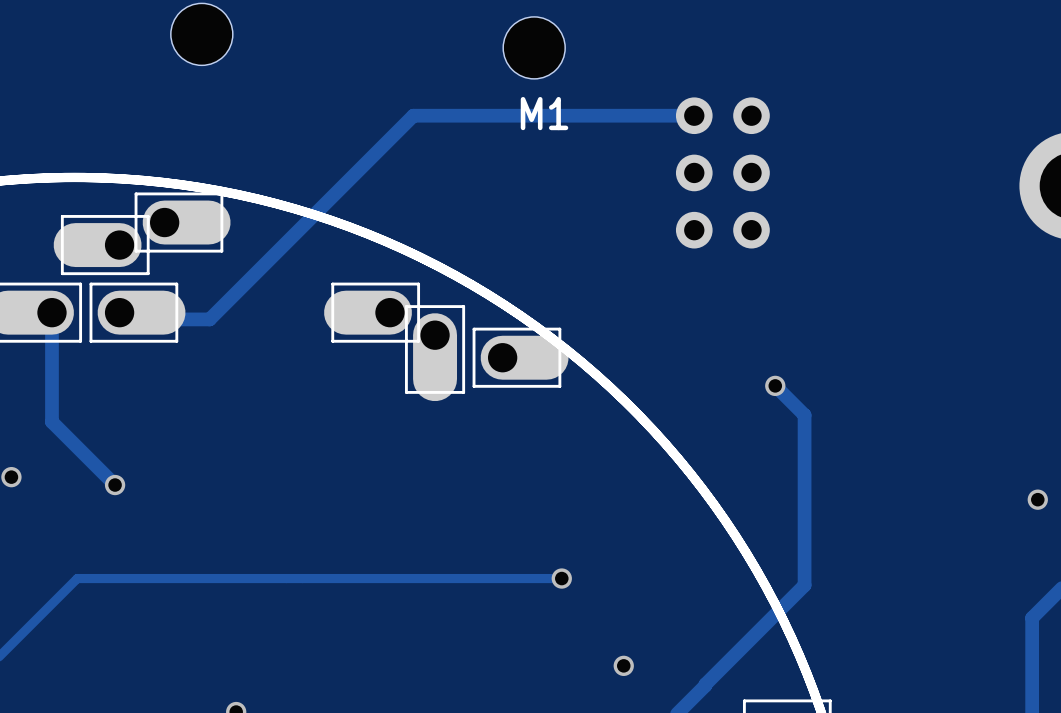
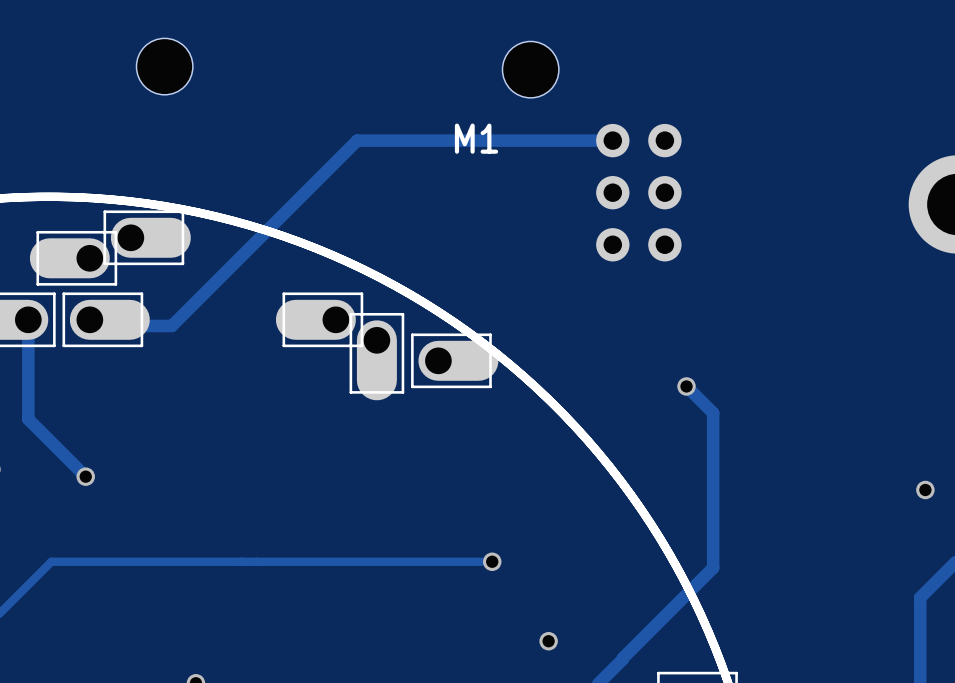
hole position: (534, 47) -> (530, 69)

